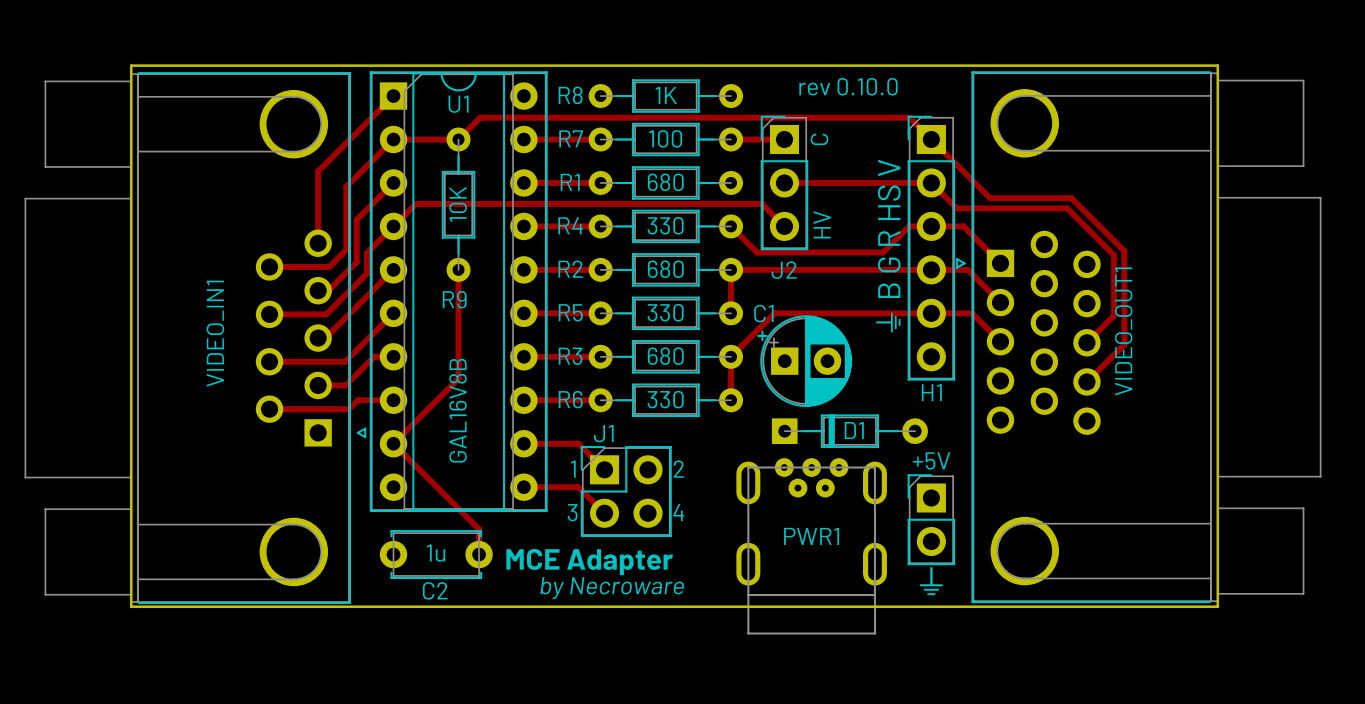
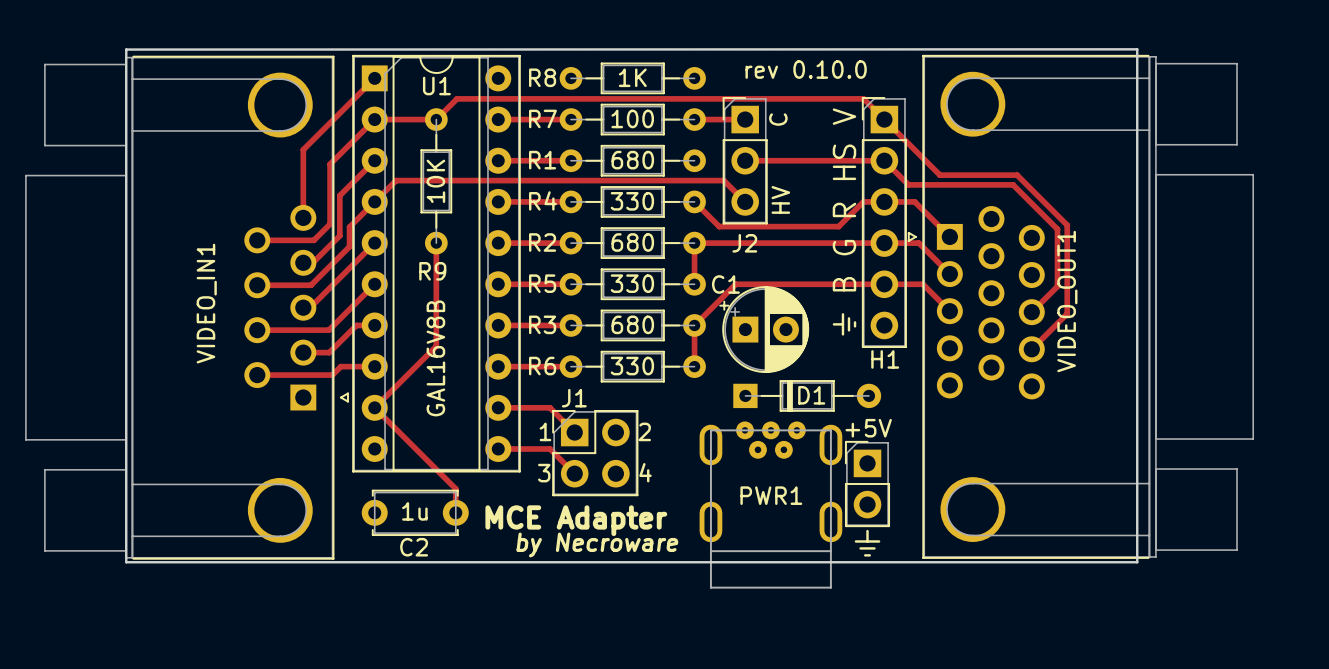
board edge: (131, 65) (1217, 65) (1217, 606) (1198, 606) -> (126, 49) (1137, 49) (1137, 562)
U1 value position: GAL16V8B (458, 410) -> GAL16V8B (435, 358)
part position: (931, 519) -> (867, 484)

